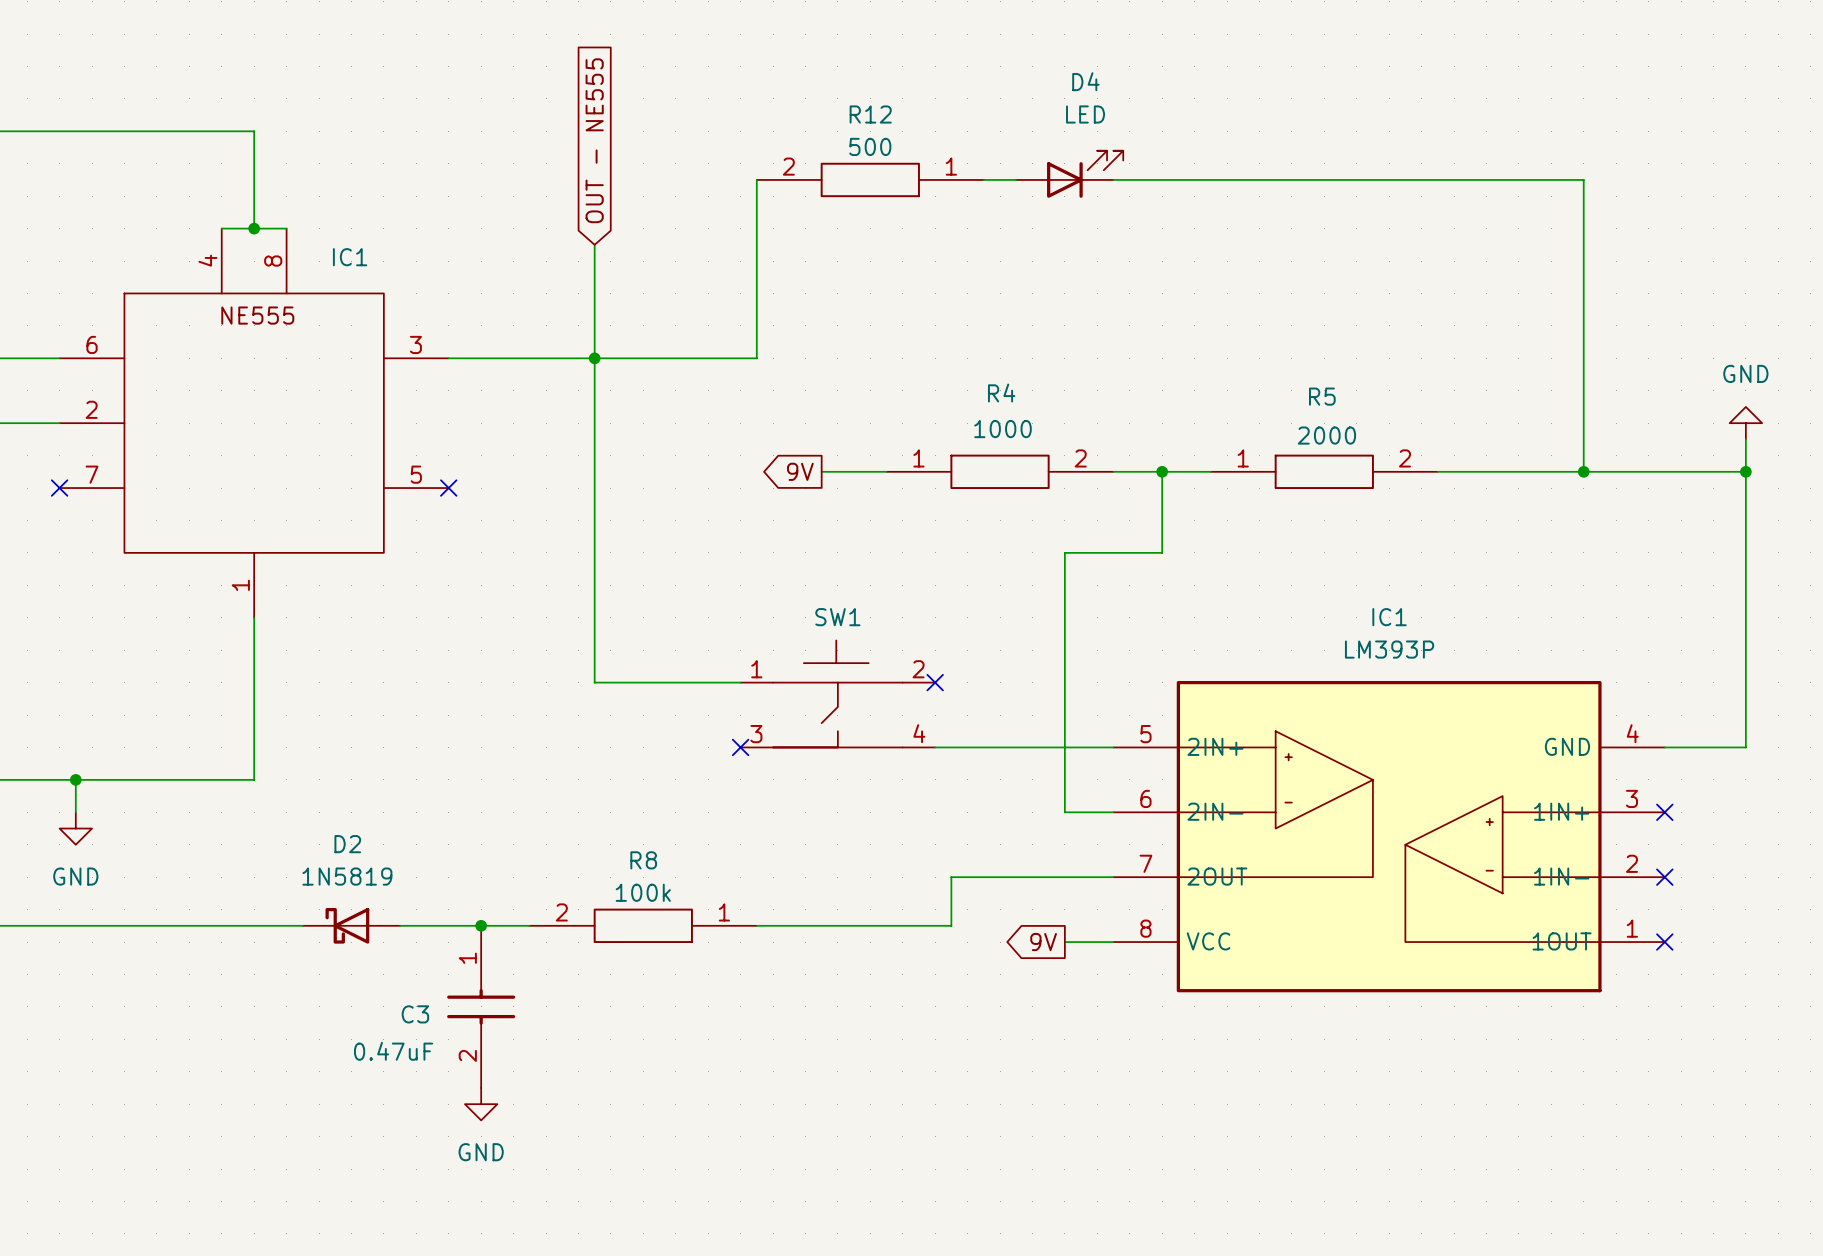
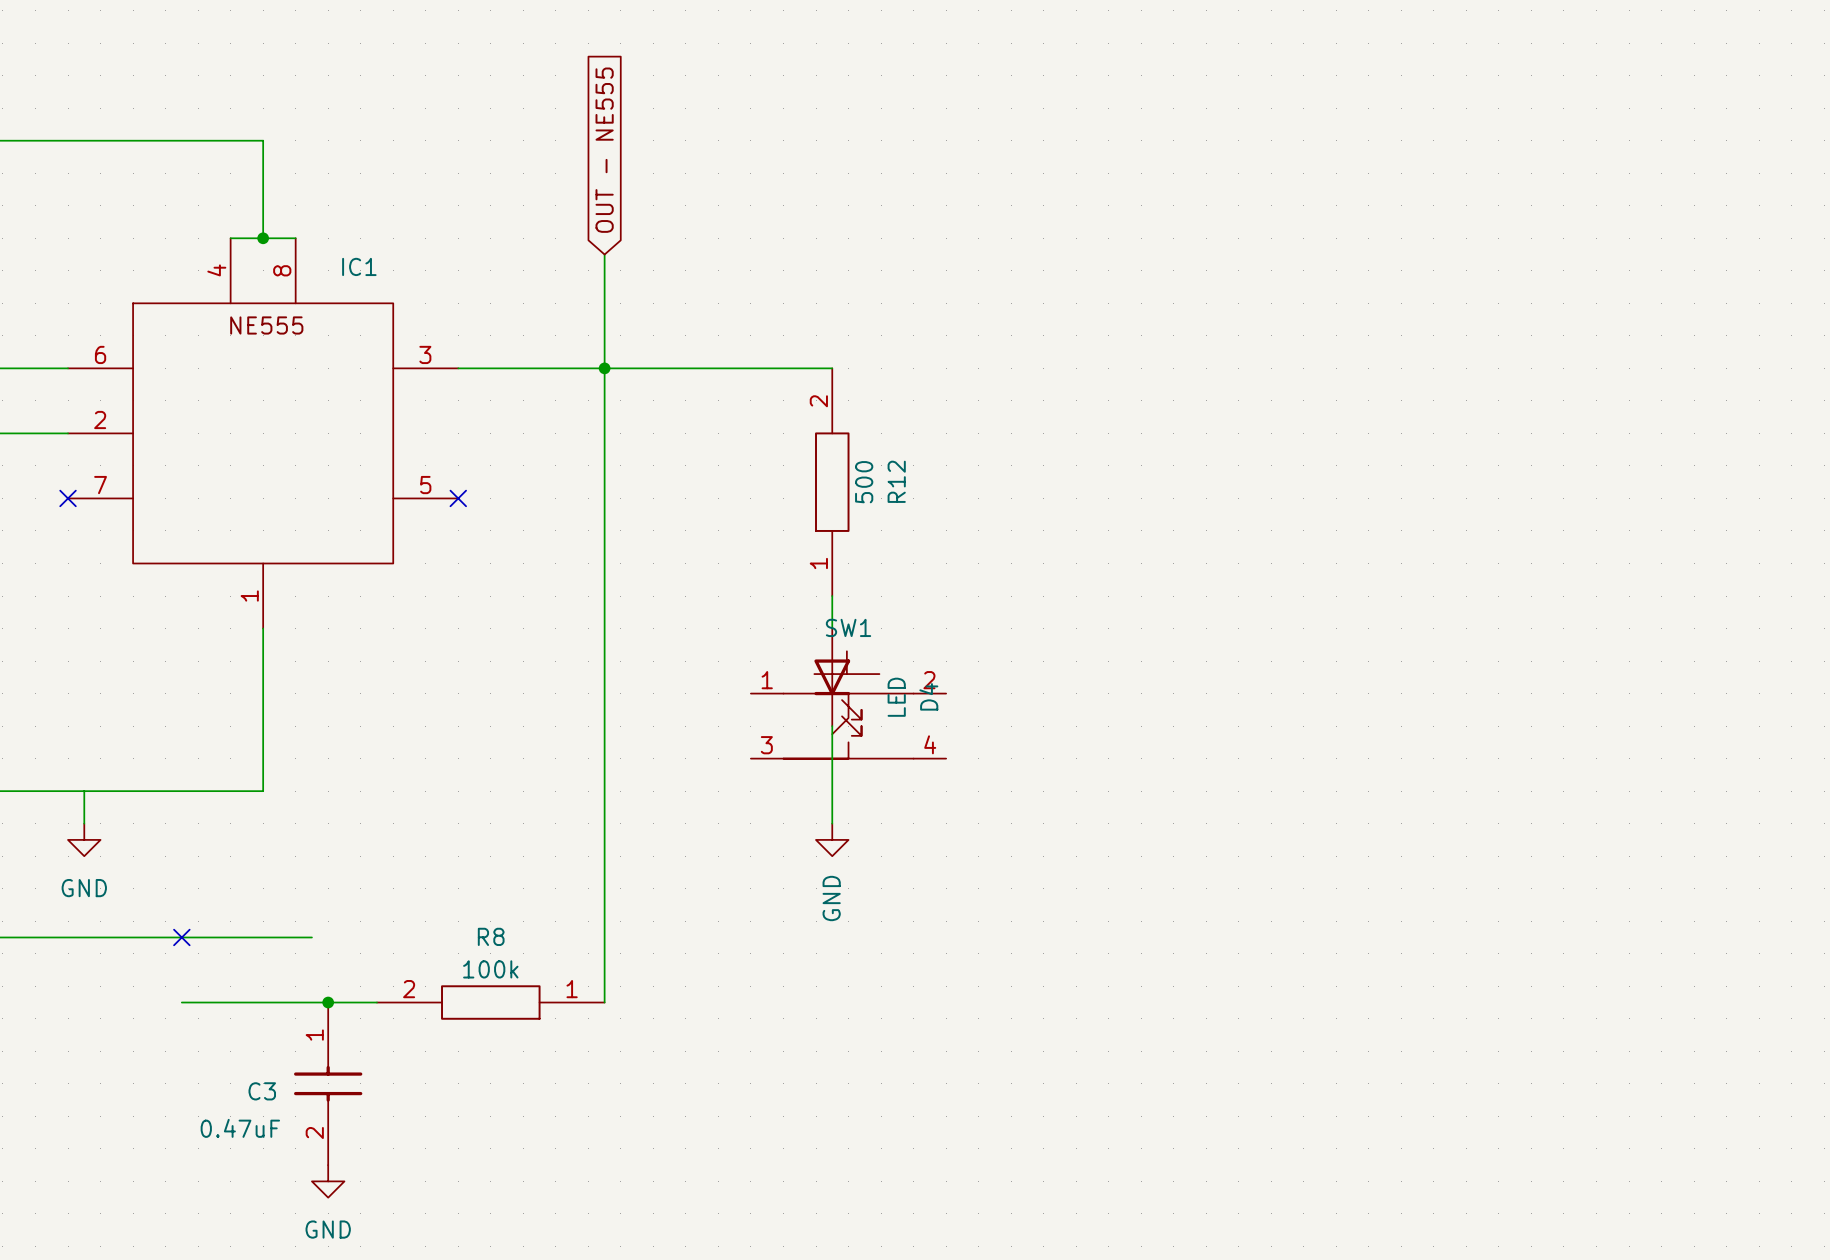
D4 position: (1069, 174) -> (837, 682)
D4 rotation: 0° (1085, 174) -> 90° clockwise (837, 697)
wire: (756, 179) (756, 358) -> (832, 368) (767, 368)
R12 rotation: 0° (870, 179) -> 90° clockwise (832, 482)
R12 position: (870, 179) -> (832, 482)
wire: (983, 179) (1016, 179) -> none
wire: (1113, 179) (1583, 179) (1583, 471) -> none
power symbol: GND (1745, 423) -> none
wire: (1745, 439) (1745, 747) (1664, 747) -> none
global label: 9V (800, 471) -> none
wire: (821, 471) (886, 471) -> none
R4: 1000 (1000, 471) -> none
wire: (1113, 471) (1210, 471) -> none
wire: (1162, 471) (1162, 552) (1064, 552) (1064, 812) (1113, 812) -> none
junction: (1162, 471) -> none
R5: 2000 (1324, 471) -> none
wire: (1437, 471) (1745, 471) -> none
junction: (1583, 471) -> none
junction: (1745, 471) -> none
wire: none -> (832, 596) (832, 628)
wire: (594, 682) (740, 682) -> (604, 693) (604, 1002)
no-connect mark: (935, 682) -> none
wire: none -> (832, 726) (832, 823)
no-connect mark: (740, 747) -> none
wire: (935, 747) (1113, 747) -> none
junction: (75, 779) -> none
no-connect mark: (1664, 812) -> none
power symbol: none -> GND (832, 839)
IC1: LM393P (1389, 836) -> none
wire: (1113, 877) (951, 877) (951, 925) (756, 925) -> none
no-connect mark: (1664, 877) -> none
no-connect mark: none -> (181, 937)
D2: 1N5819 (351, 925) -> none
wire: (400, 925) (529, 925) -> none
junction: (481, 925) -> none
R8 position: (643, 925) -> (490, 1002)
global label: 9V (1043, 942) -> none
wire: (1064, 942) (1113, 942) -> none
no-connect mark: (1664, 942) -> none
wire: none -> (181, 1002) (376, 1002)
junction: none -> (328, 1002)
C3 position: (481, 1006) -> (328, 1083)
power symbol position: GND (481, 1104) -> GND (328, 1181)

